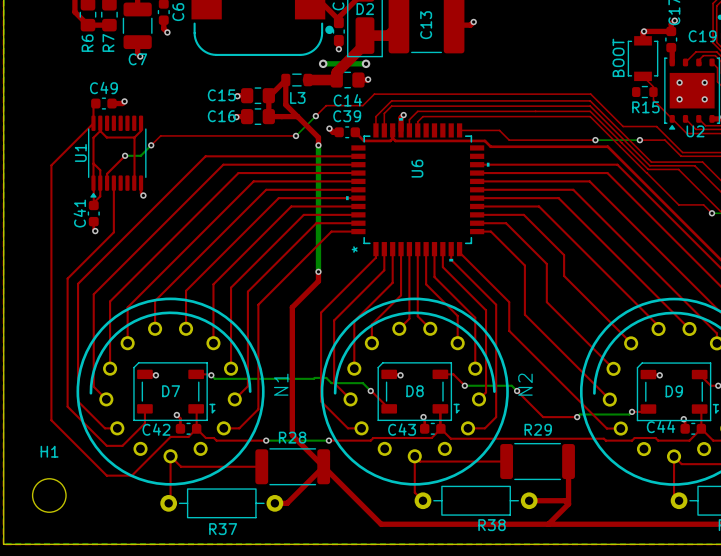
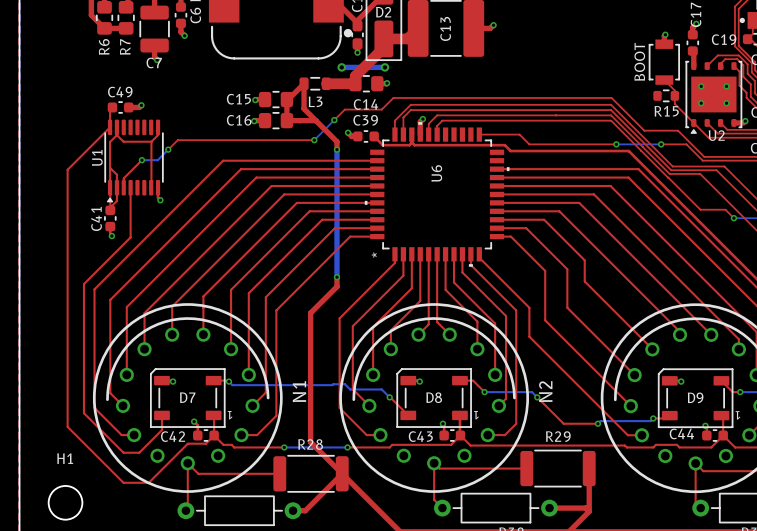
top track: (644, 31) (671, 31) -> none

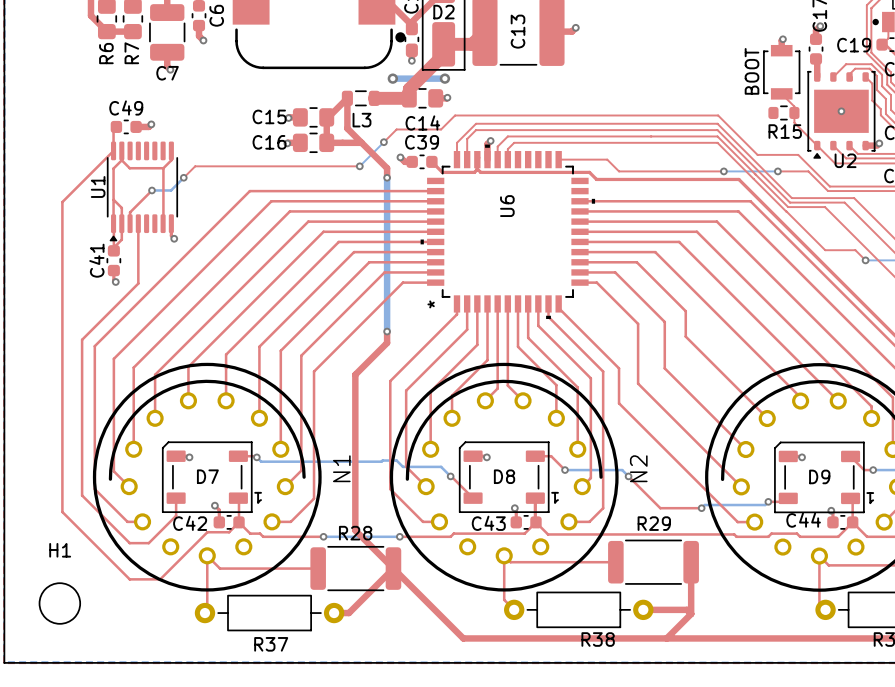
via: (701, 86) -> none
via: (726, 86) -> none
via: none -> (841, 111)
via: (701, 103) -> none
via: (726, 103) -> none

